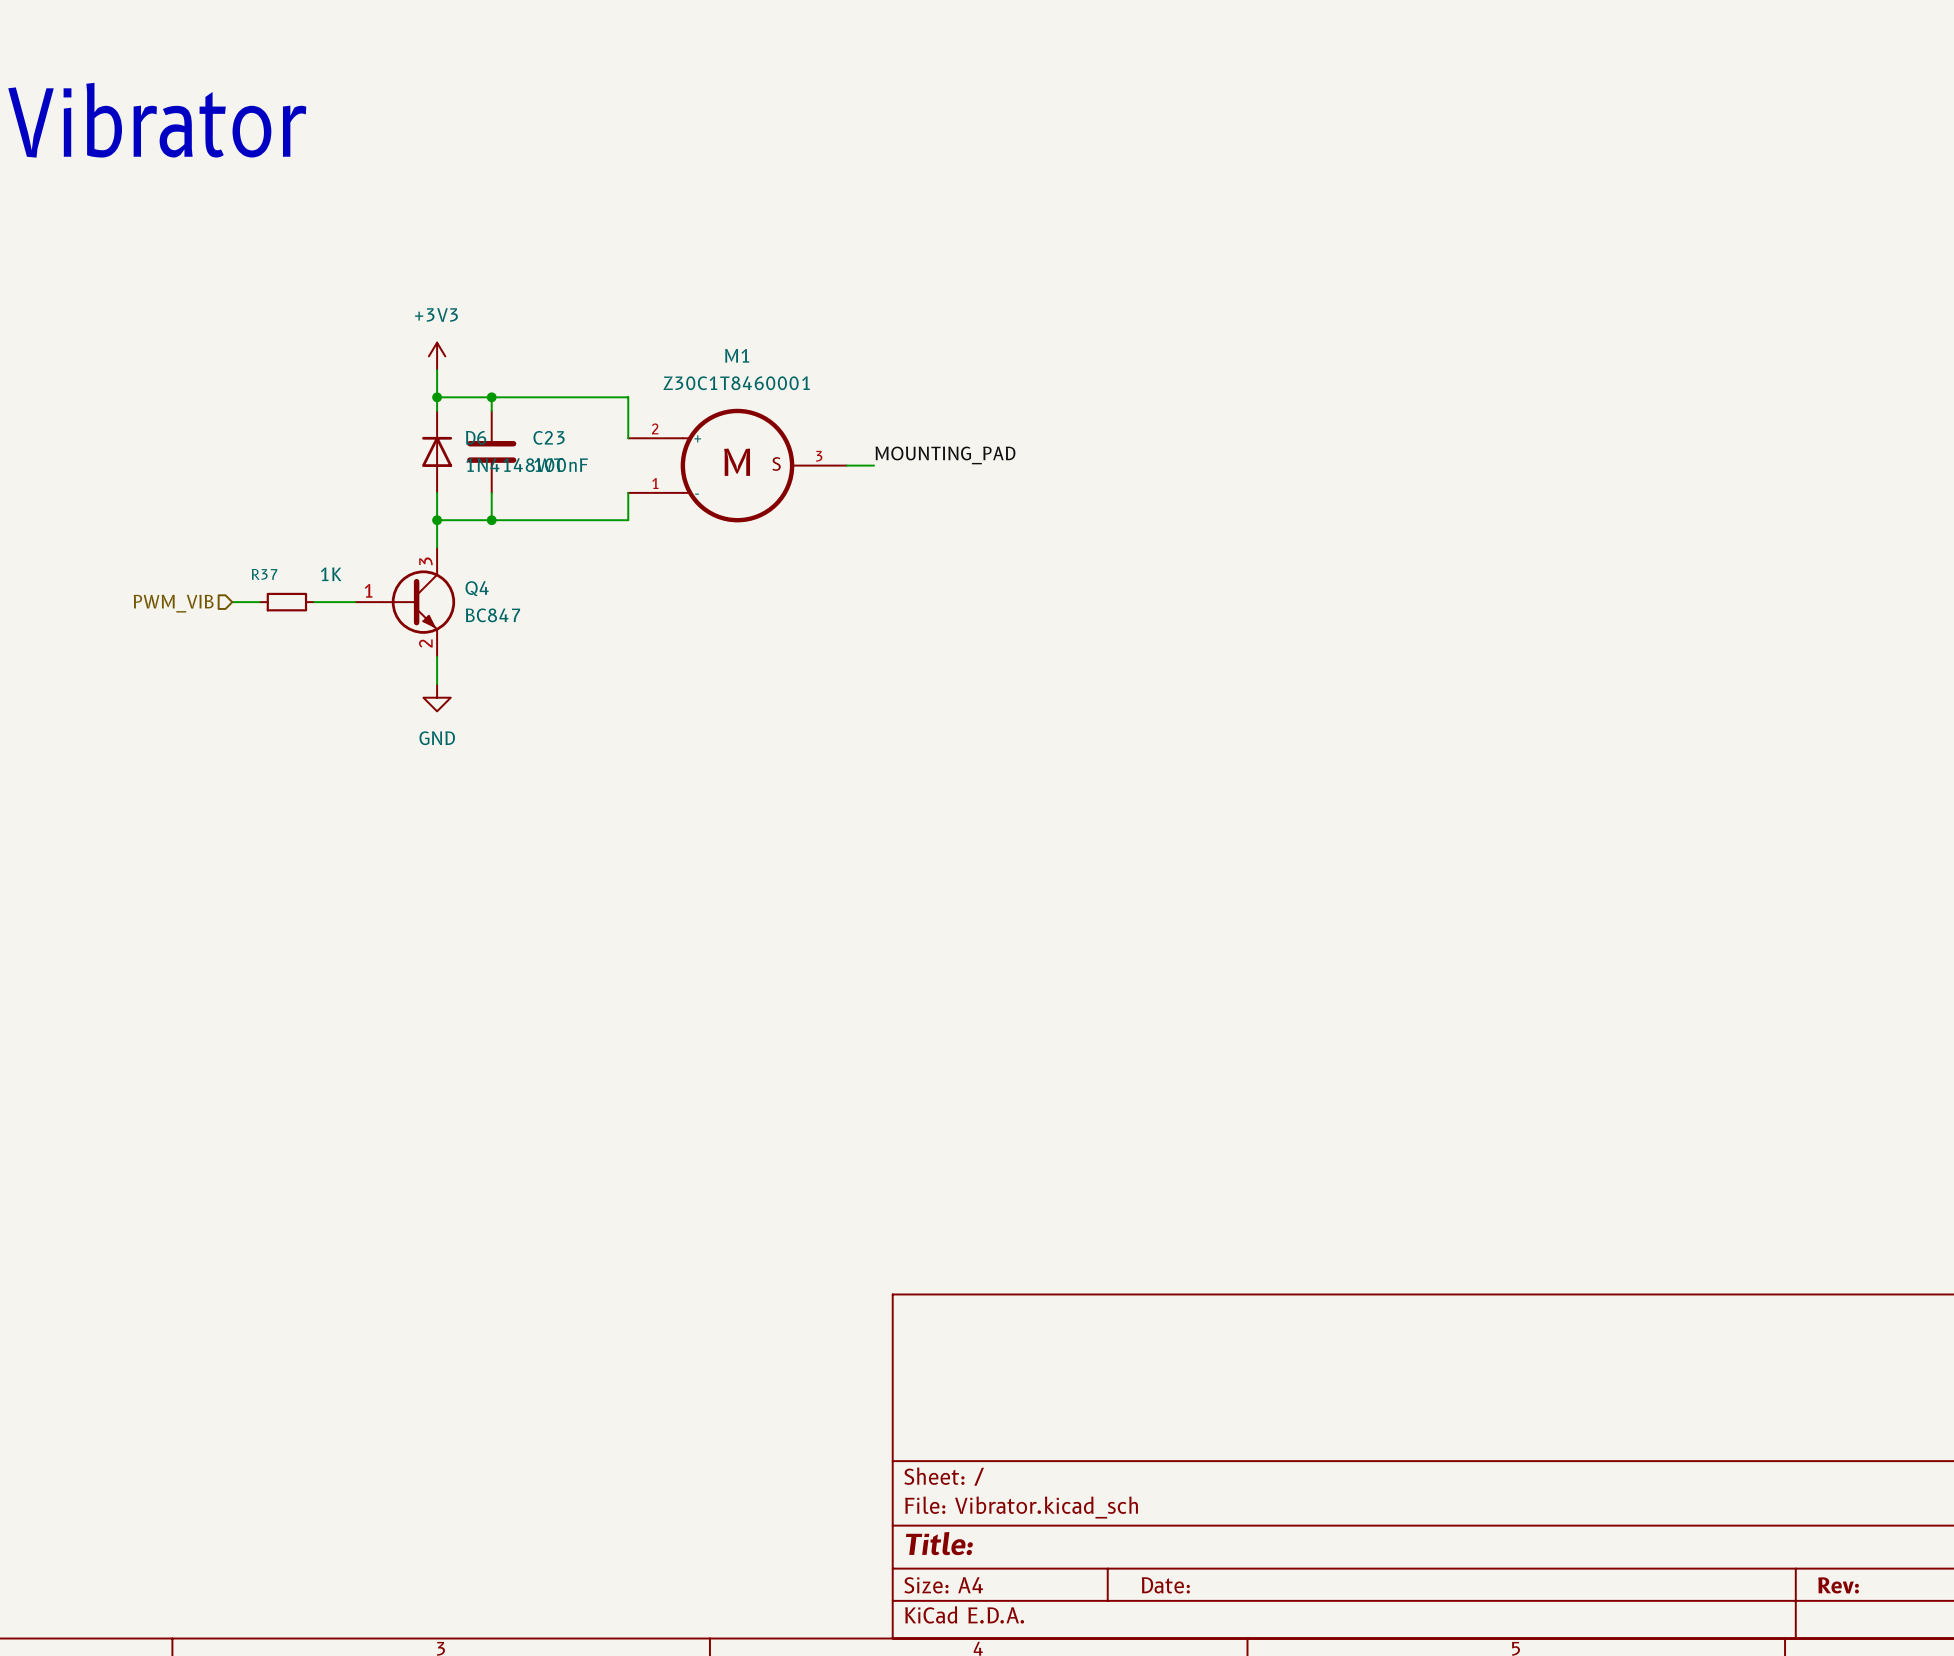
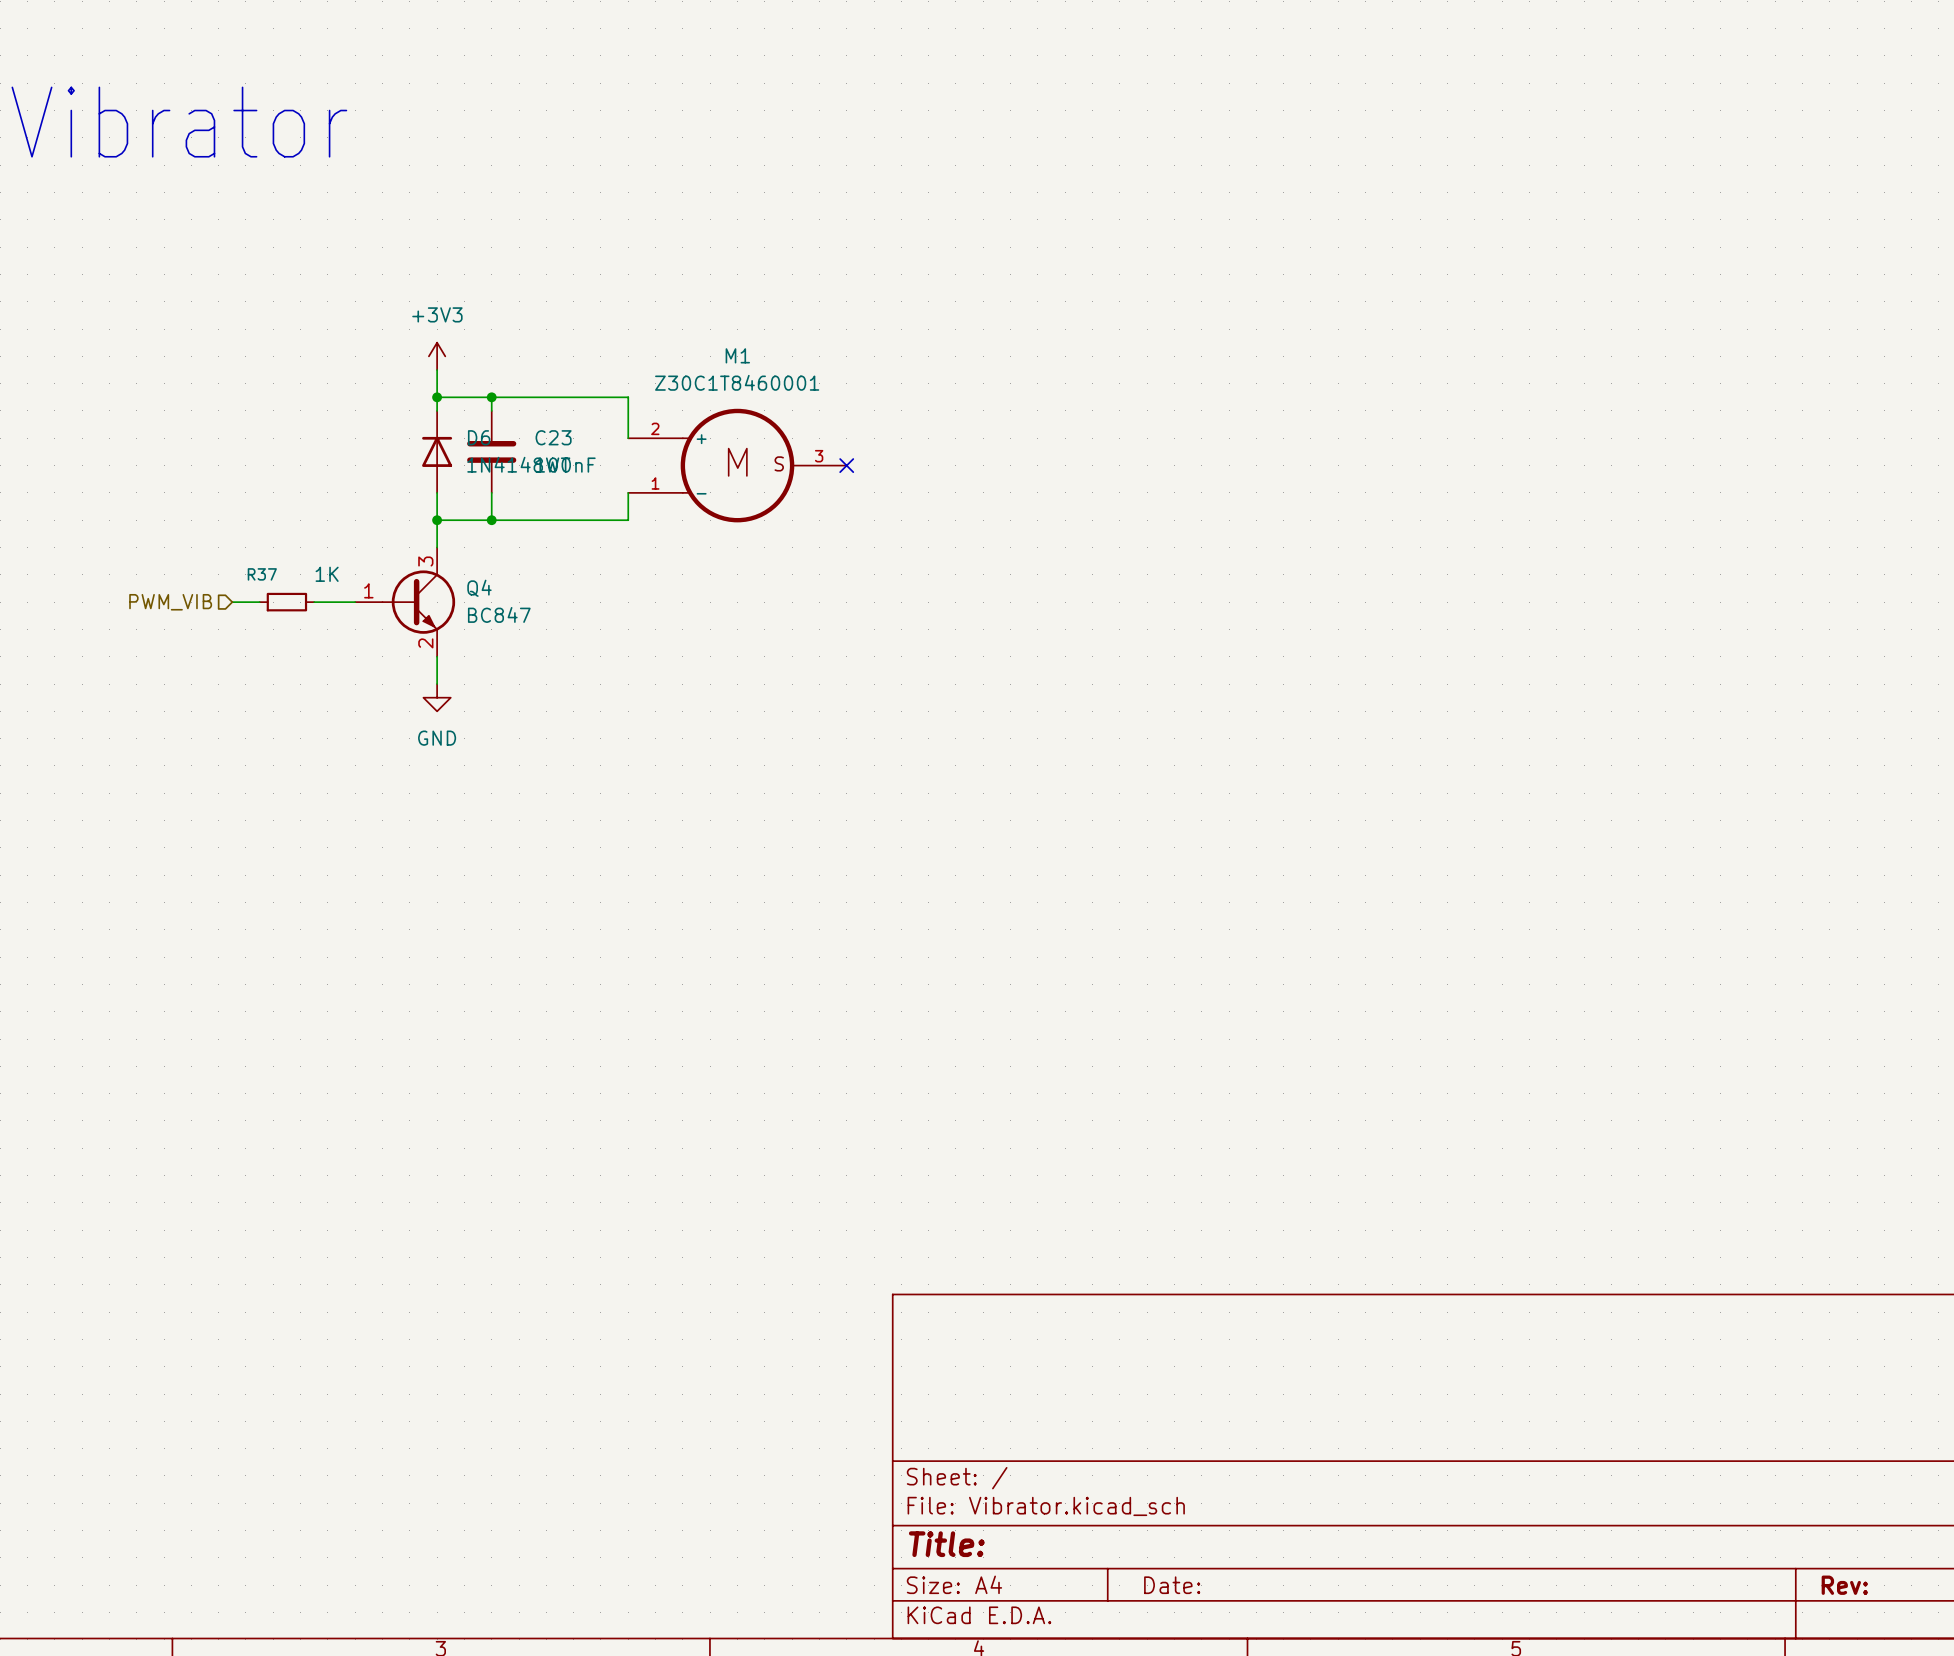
label: MOUNTING_PAD (945, 455) -> none
wire: (846, 465) (874, 465) -> none
no-connect mark: none -> (846, 465)

